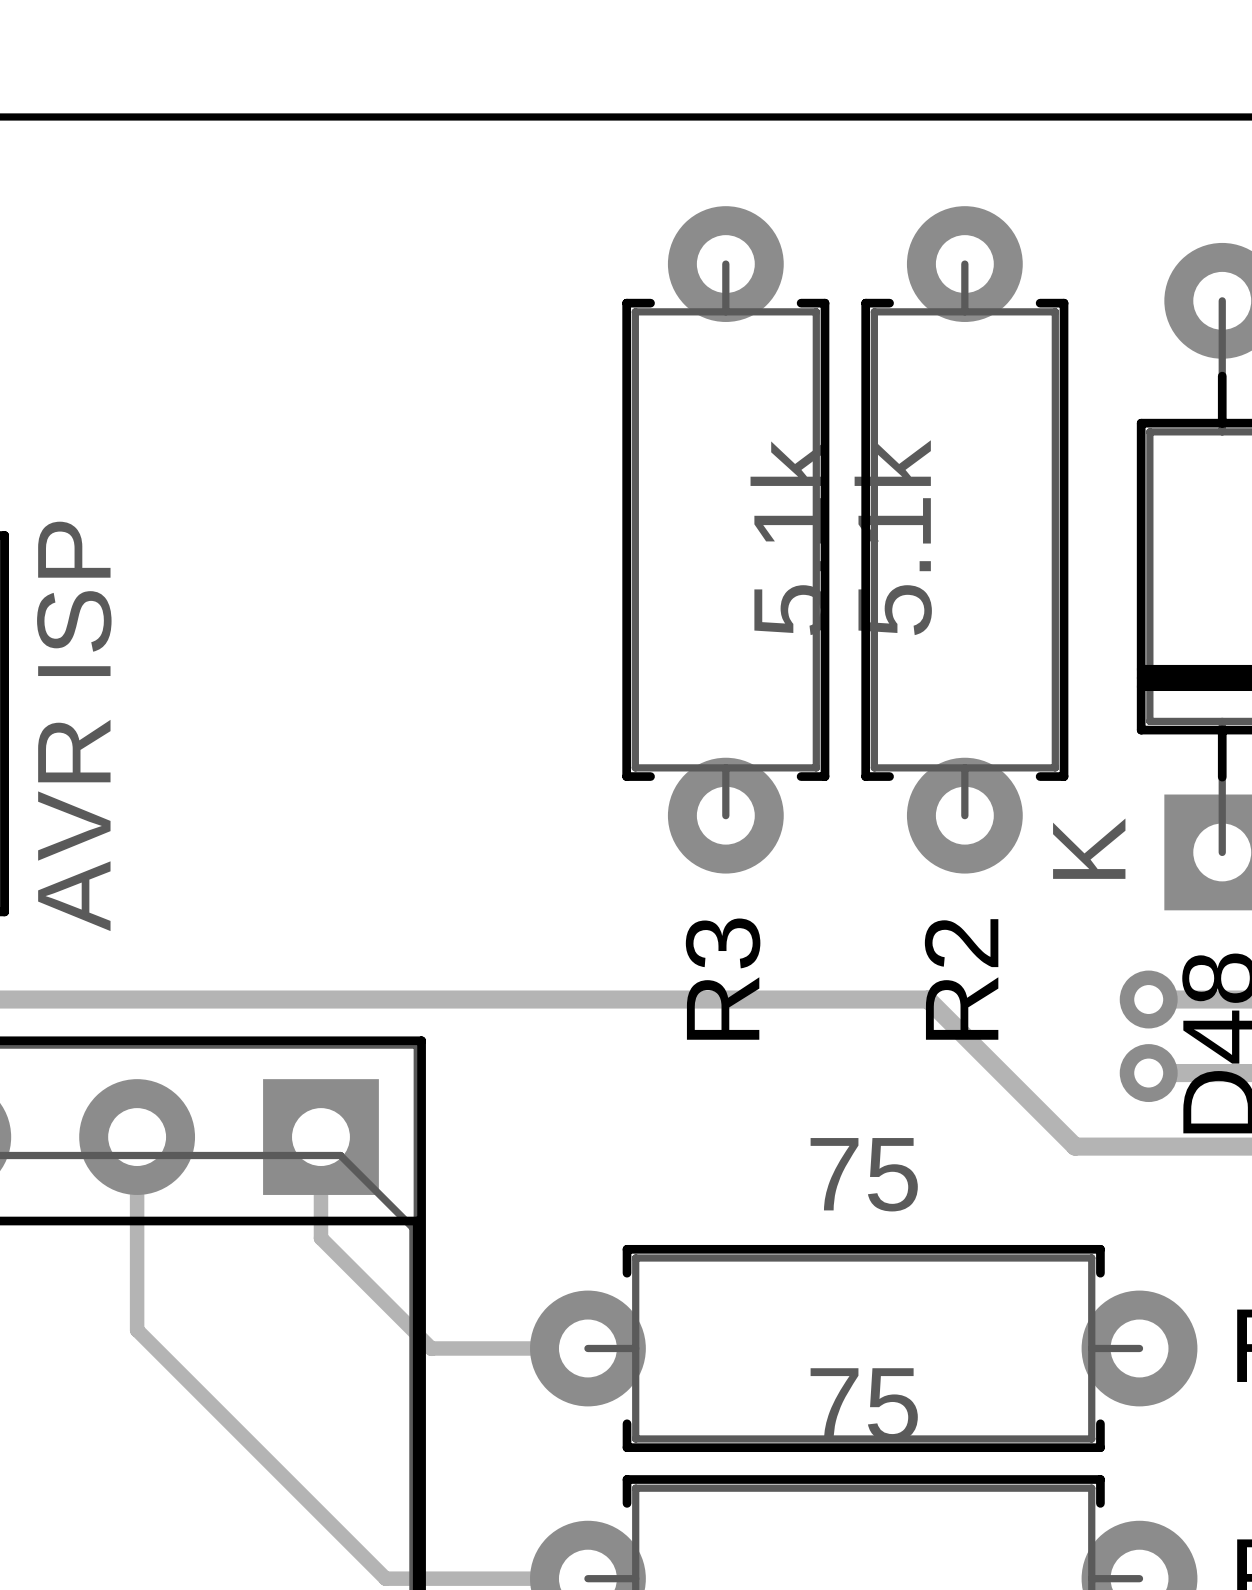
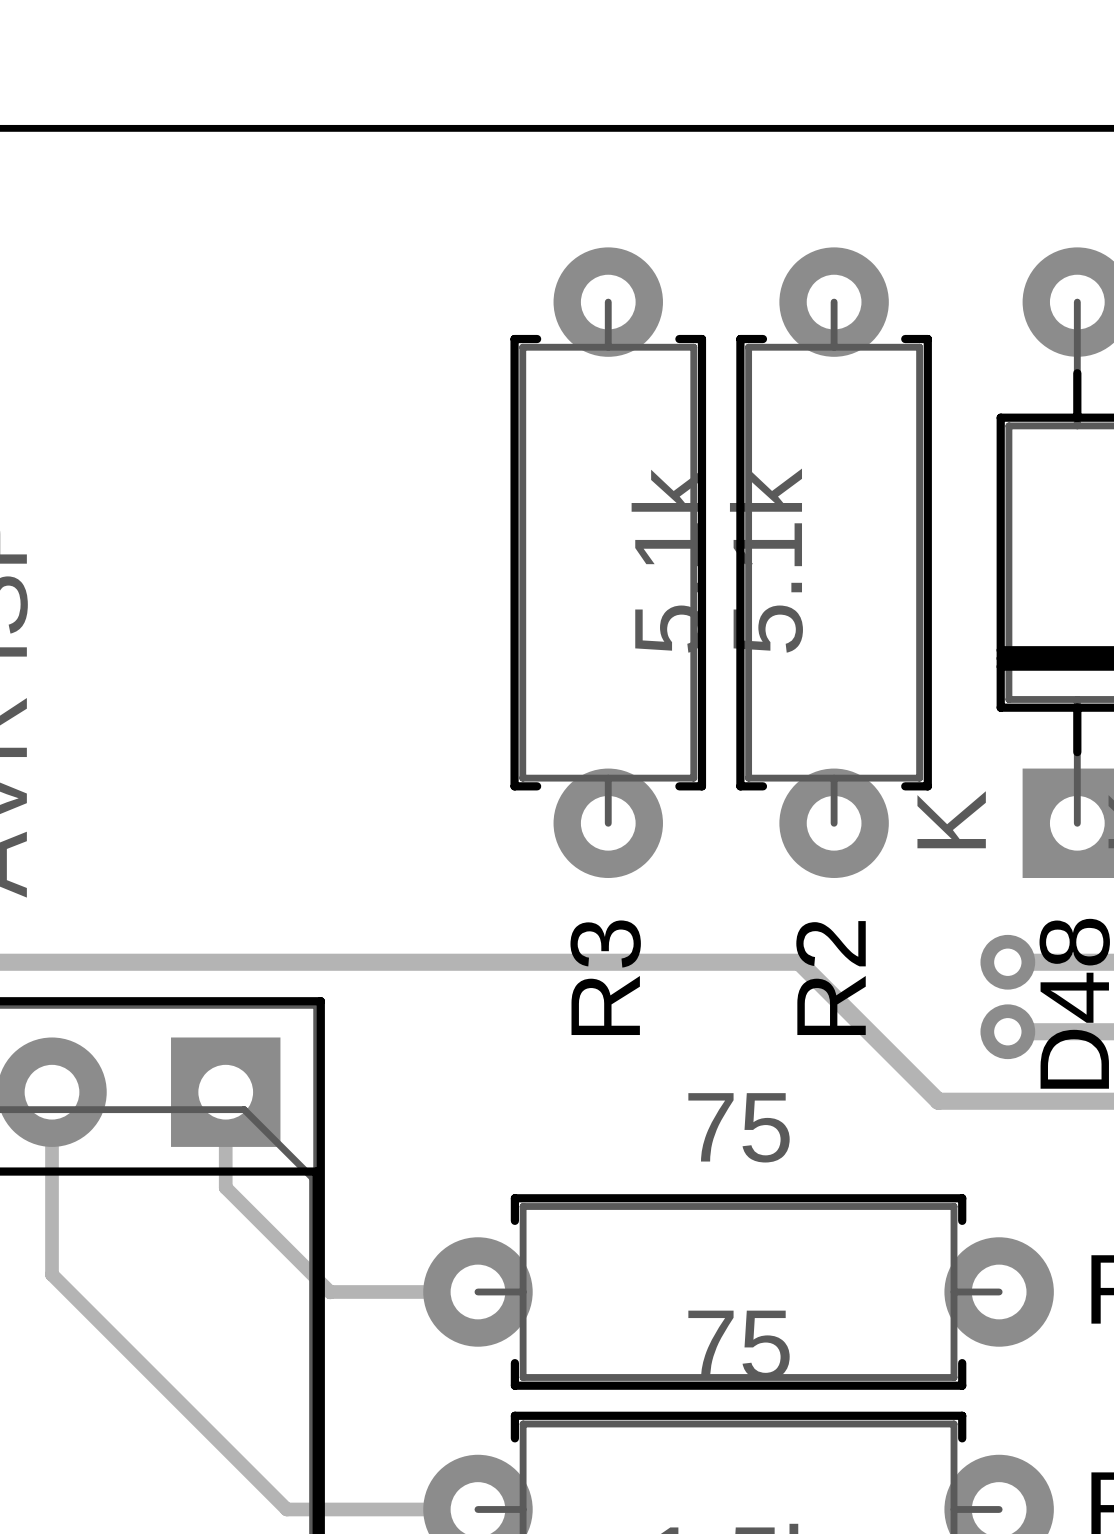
R3 position: (725, 539) -> (608, 562)
R2 position: (964, 539) -> (834, 562)

